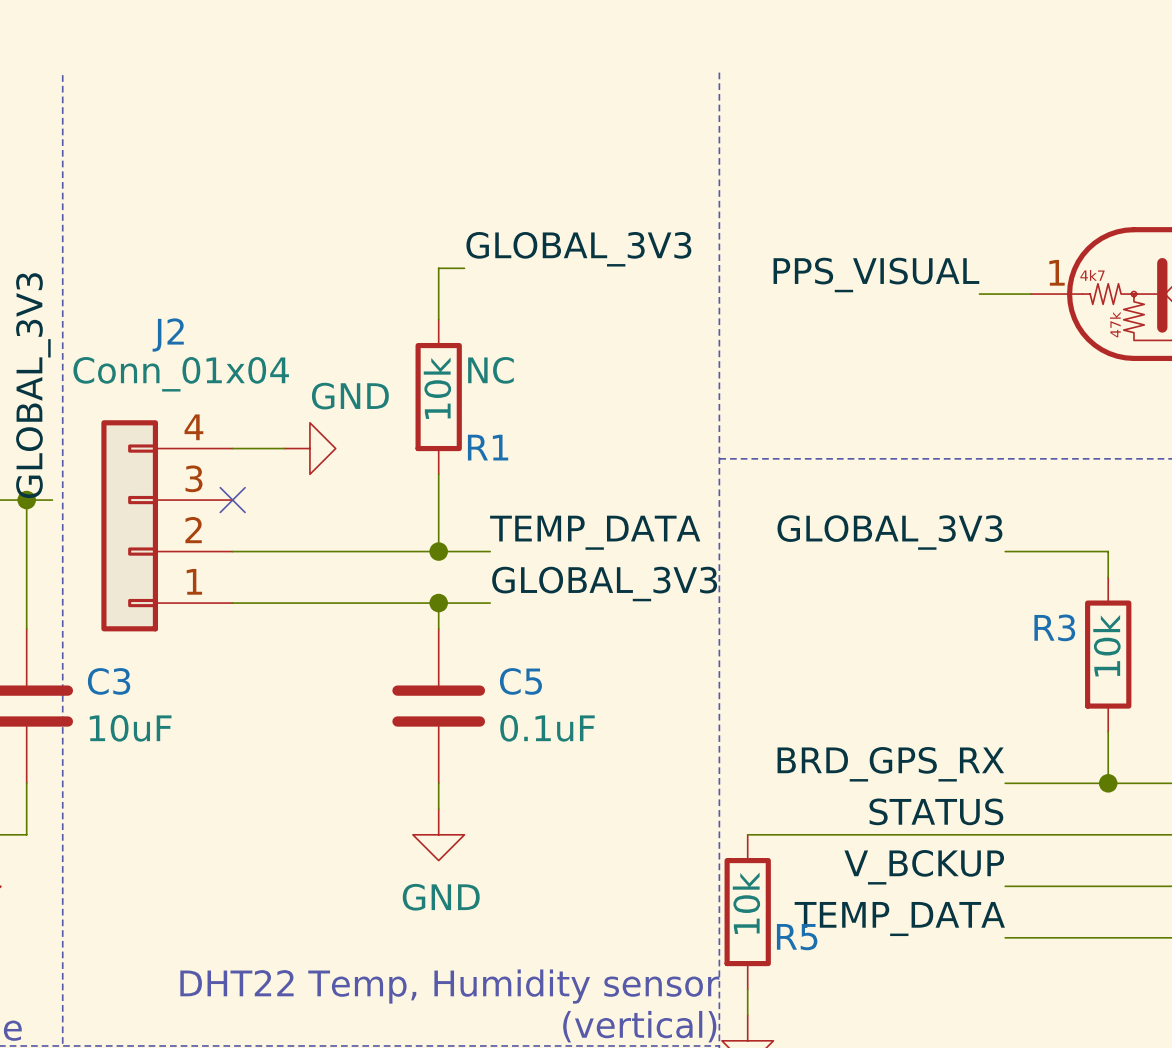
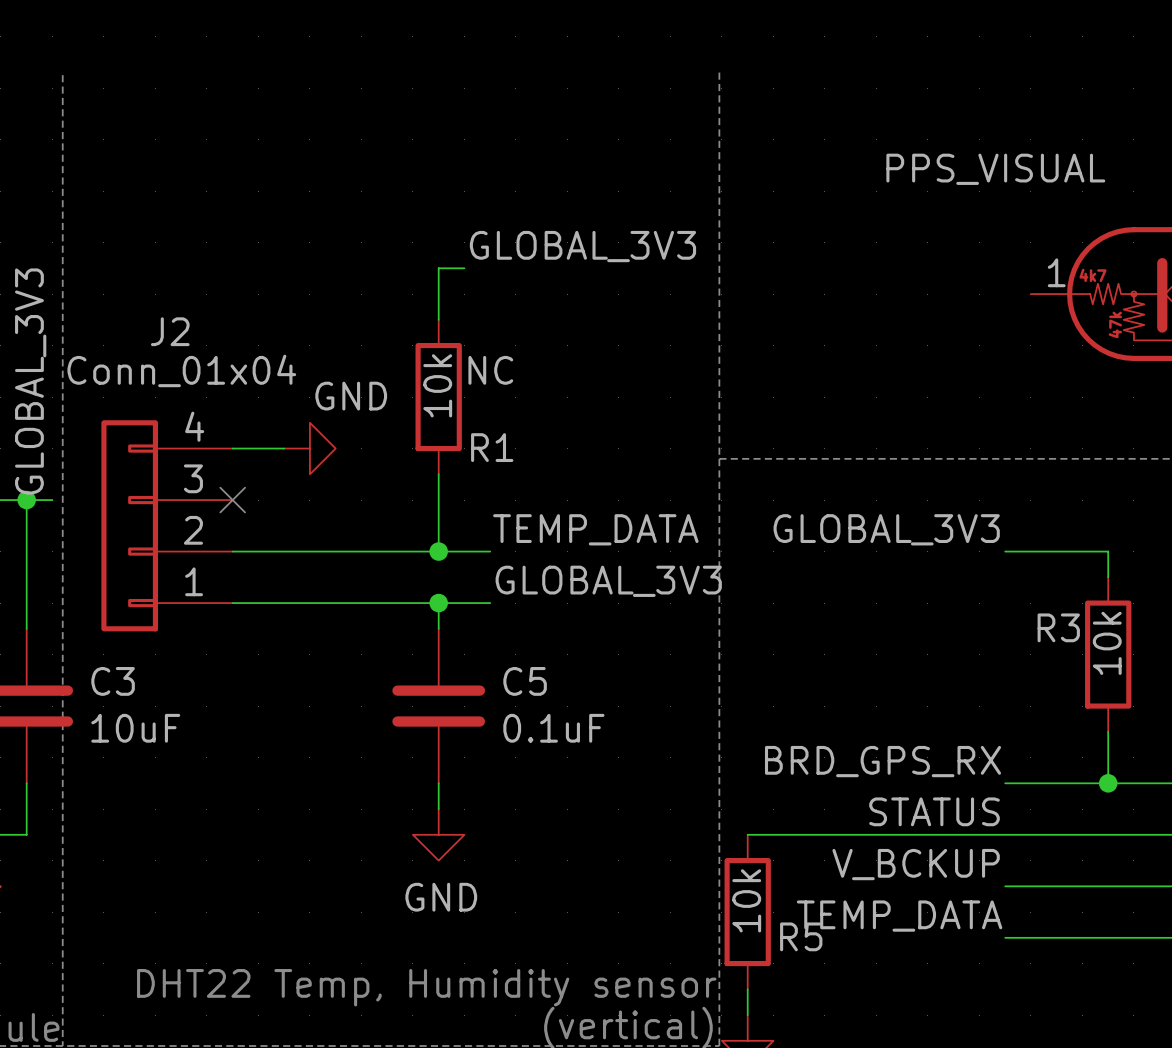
label position: PPS_VISUAL (876, 275) -> PPS_VISUAL (995, 169)
wire: (979, 294) (1030, 294) -> none

